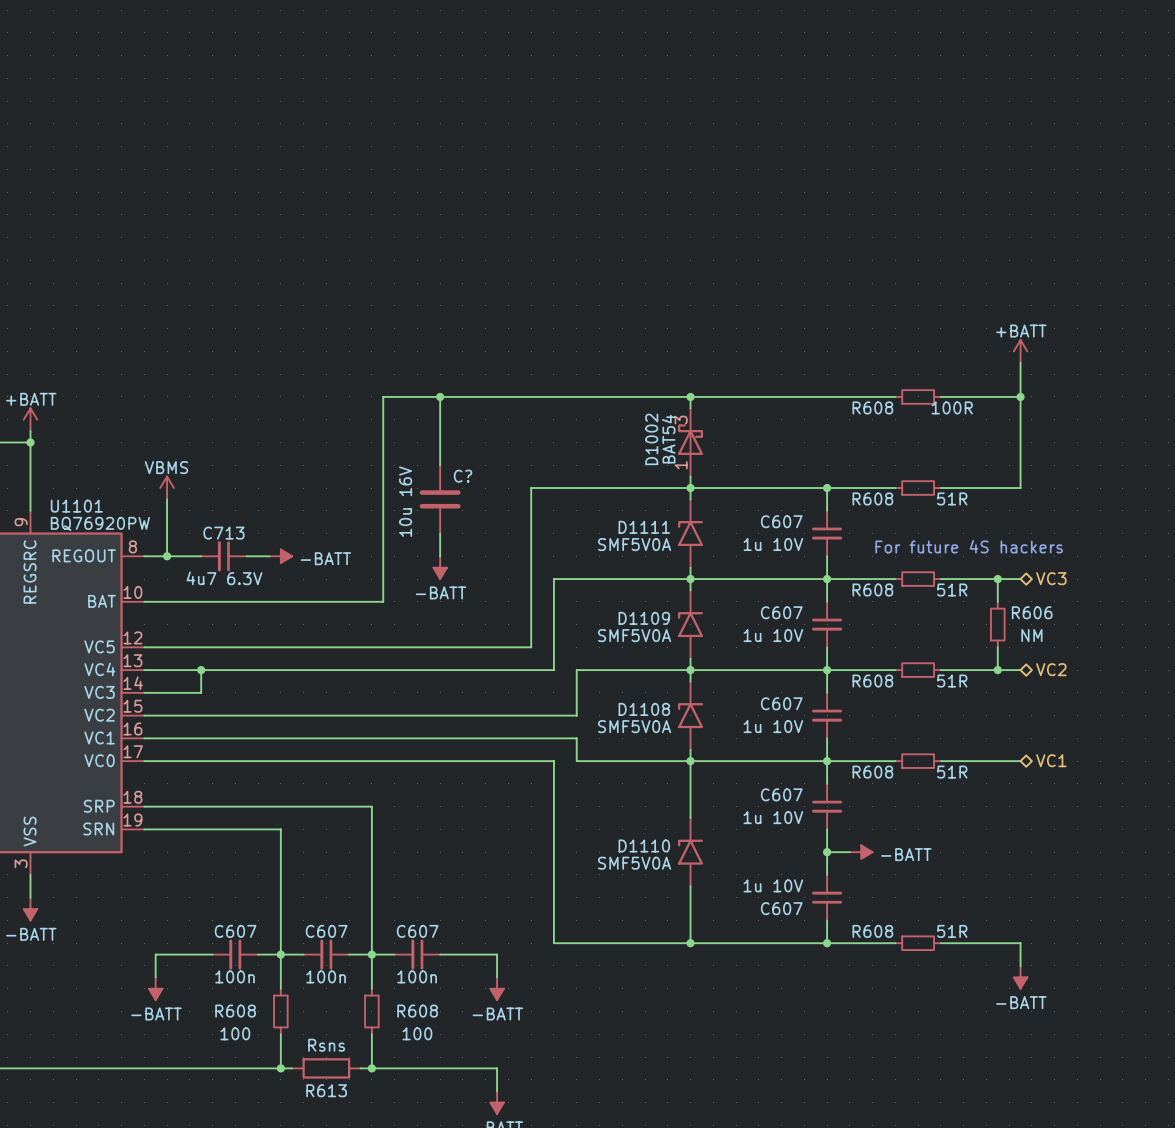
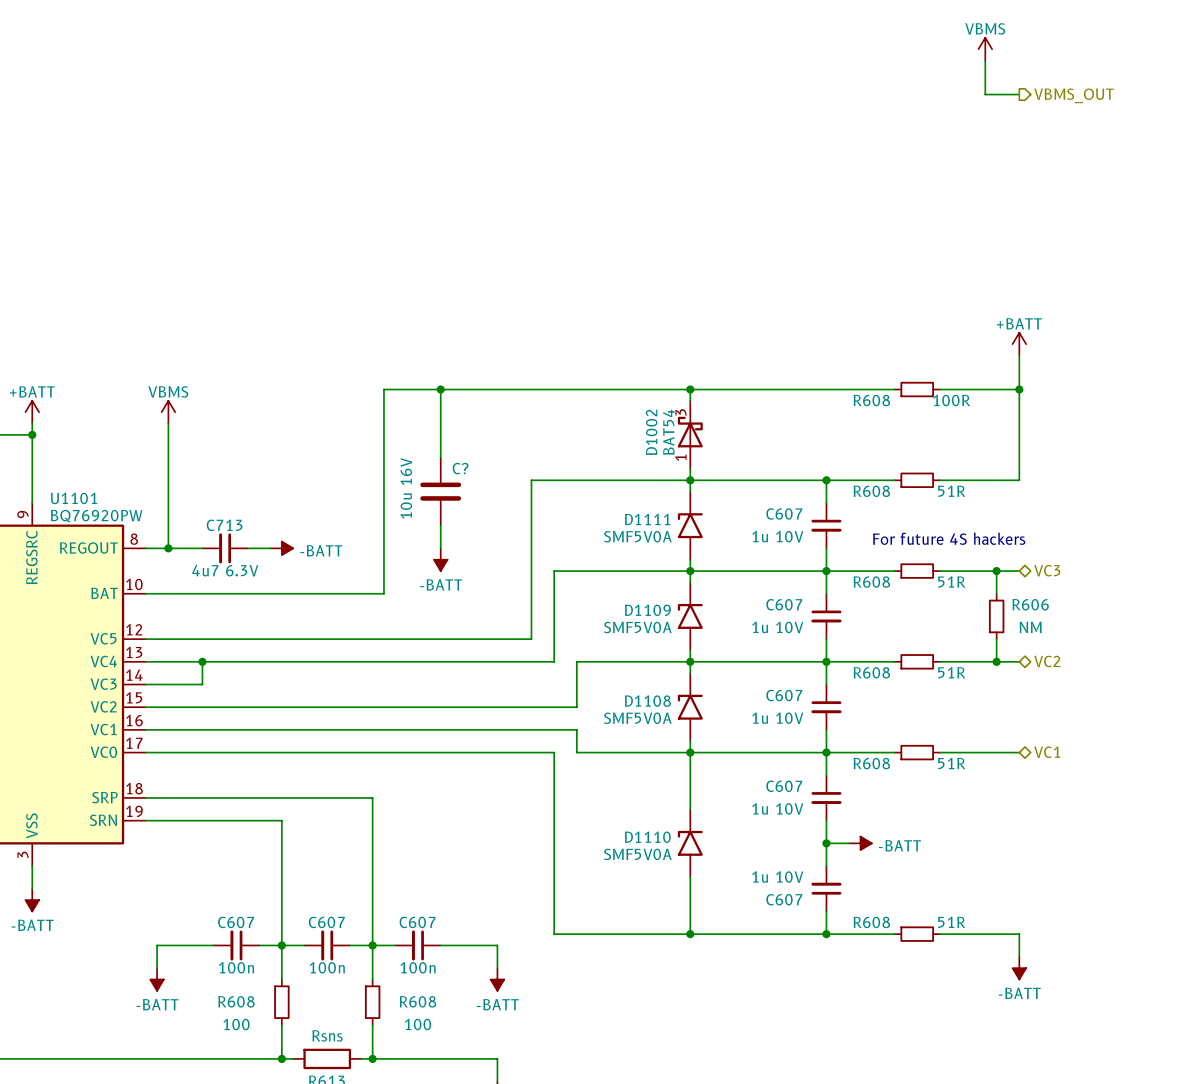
power symbol: none -> VBMS (985, 49)
wire: none -> (985, 60) (985, 94) (1019, 94)
hierarchical label: none -> VBMS_OUT (1073, 95)
wire: none -> (168, 423) (168, 491)
power symbol position: VBMS (167, 488) -> VBMS (168, 412)

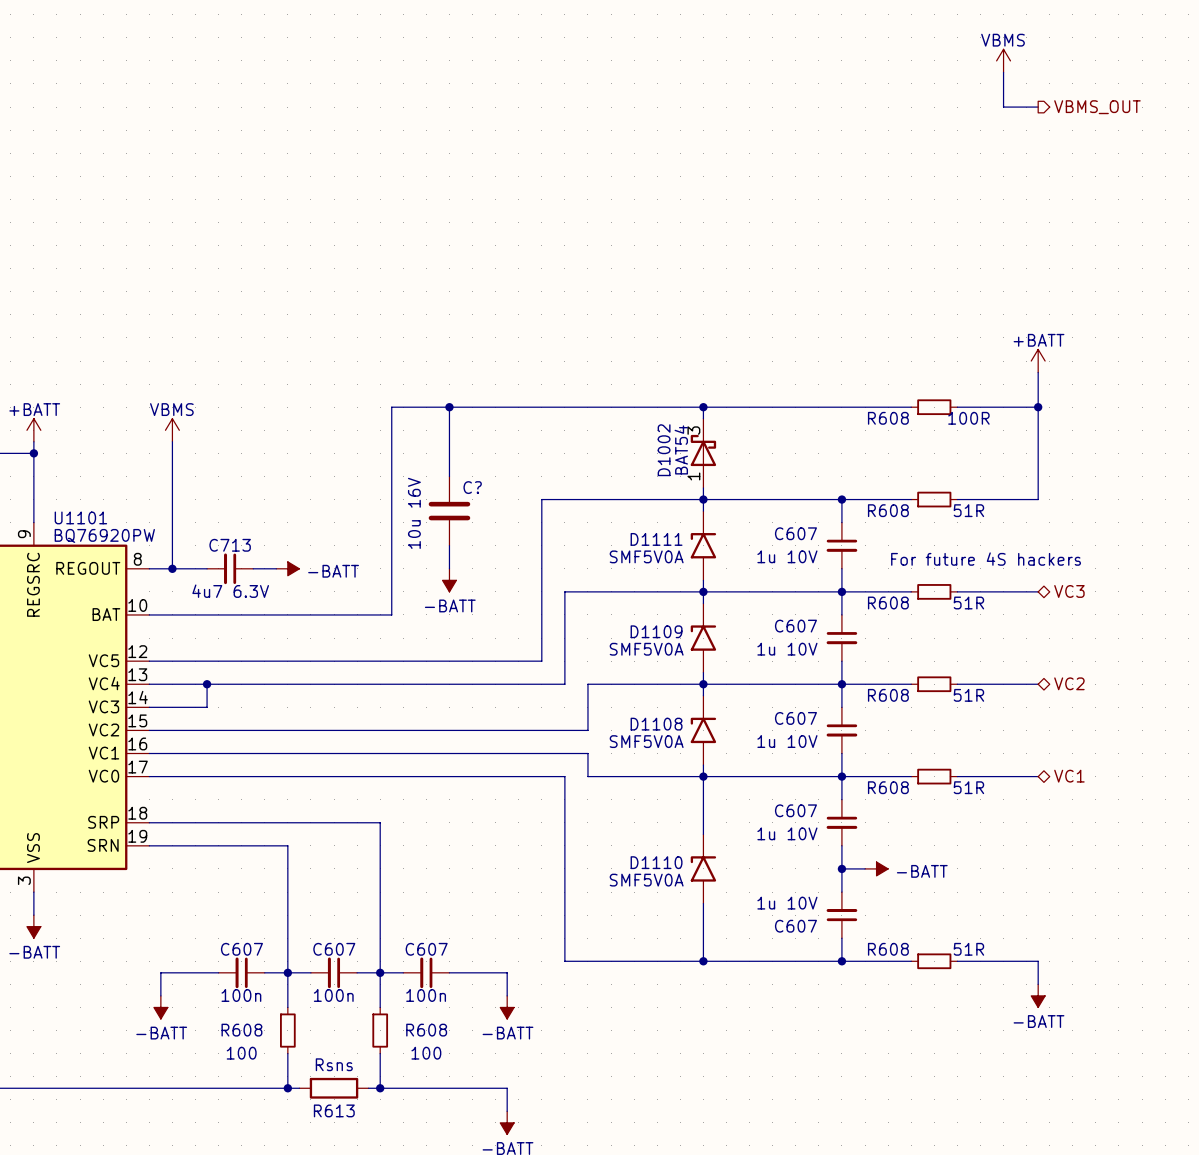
wire: (996, 571) (996, 593) -> none
junction: (996, 571) -> none
R606: NM (996, 616) -> none
wire: (996, 639) (996, 661) -> none
junction: (996, 661) -> none

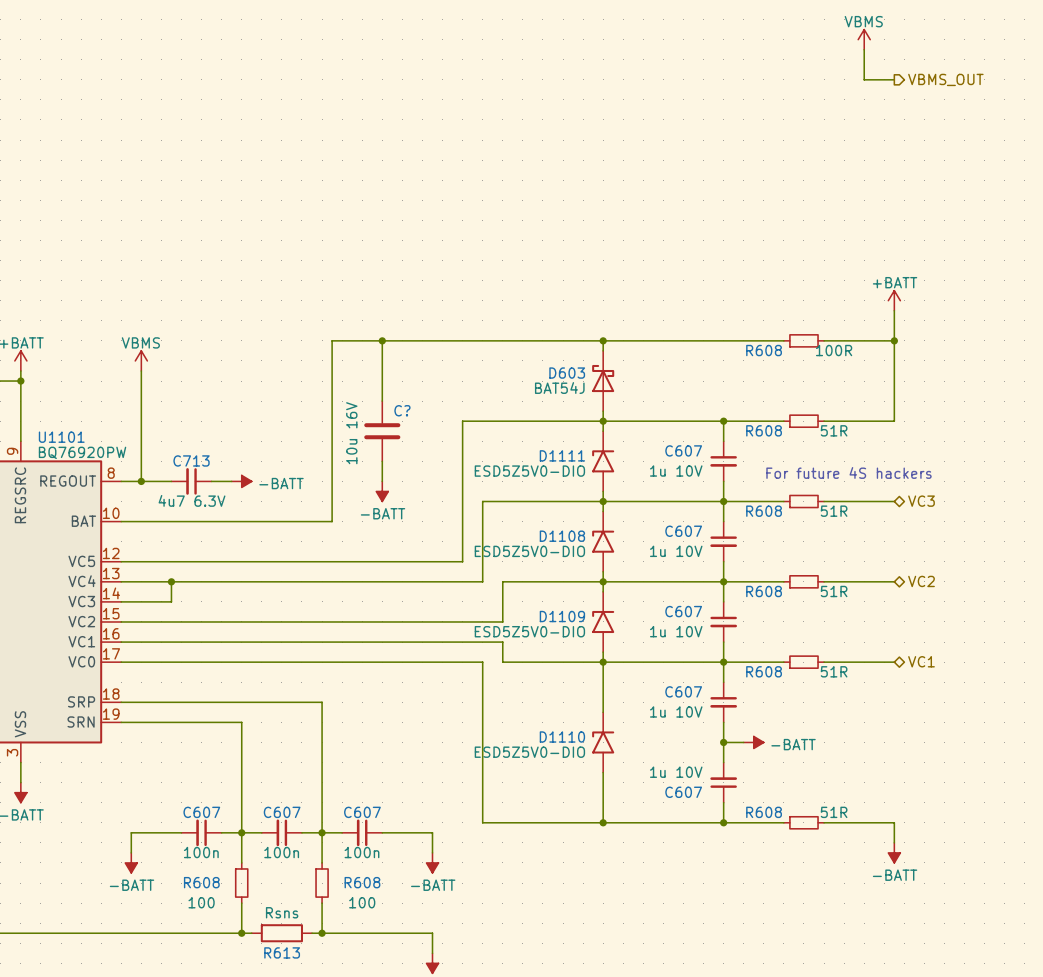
D1002 pin number: 3 (693, 430) -> none
D1002 value: BAT54 (681, 449) -> BAT54J (559, 388)
D1002 name: D1002 (664, 450) -> D603 (567, 373)
D1002 pin number: 1 (693, 476) -> none
D1111 value: SMF5V0A (646, 556) -> ESD5Z5V0-DIO (529, 471)
D1109 name: D1109 (656, 631) -> D1108 (562, 536)
D1109 value: SMF5V0A (646, 649) -> ESD5Z5V0-DIO (529, 551)
D1108 name: D1108 (656, 724) -> D1109 (562, 616)
D1108 value: SMF5V0A (646, 741) -> ESD5Z5V0-DIO (529, 631)
D1110 value: SMF5V0A (646, 880) -> ESD5Z5V0-DIO (529, 752)

